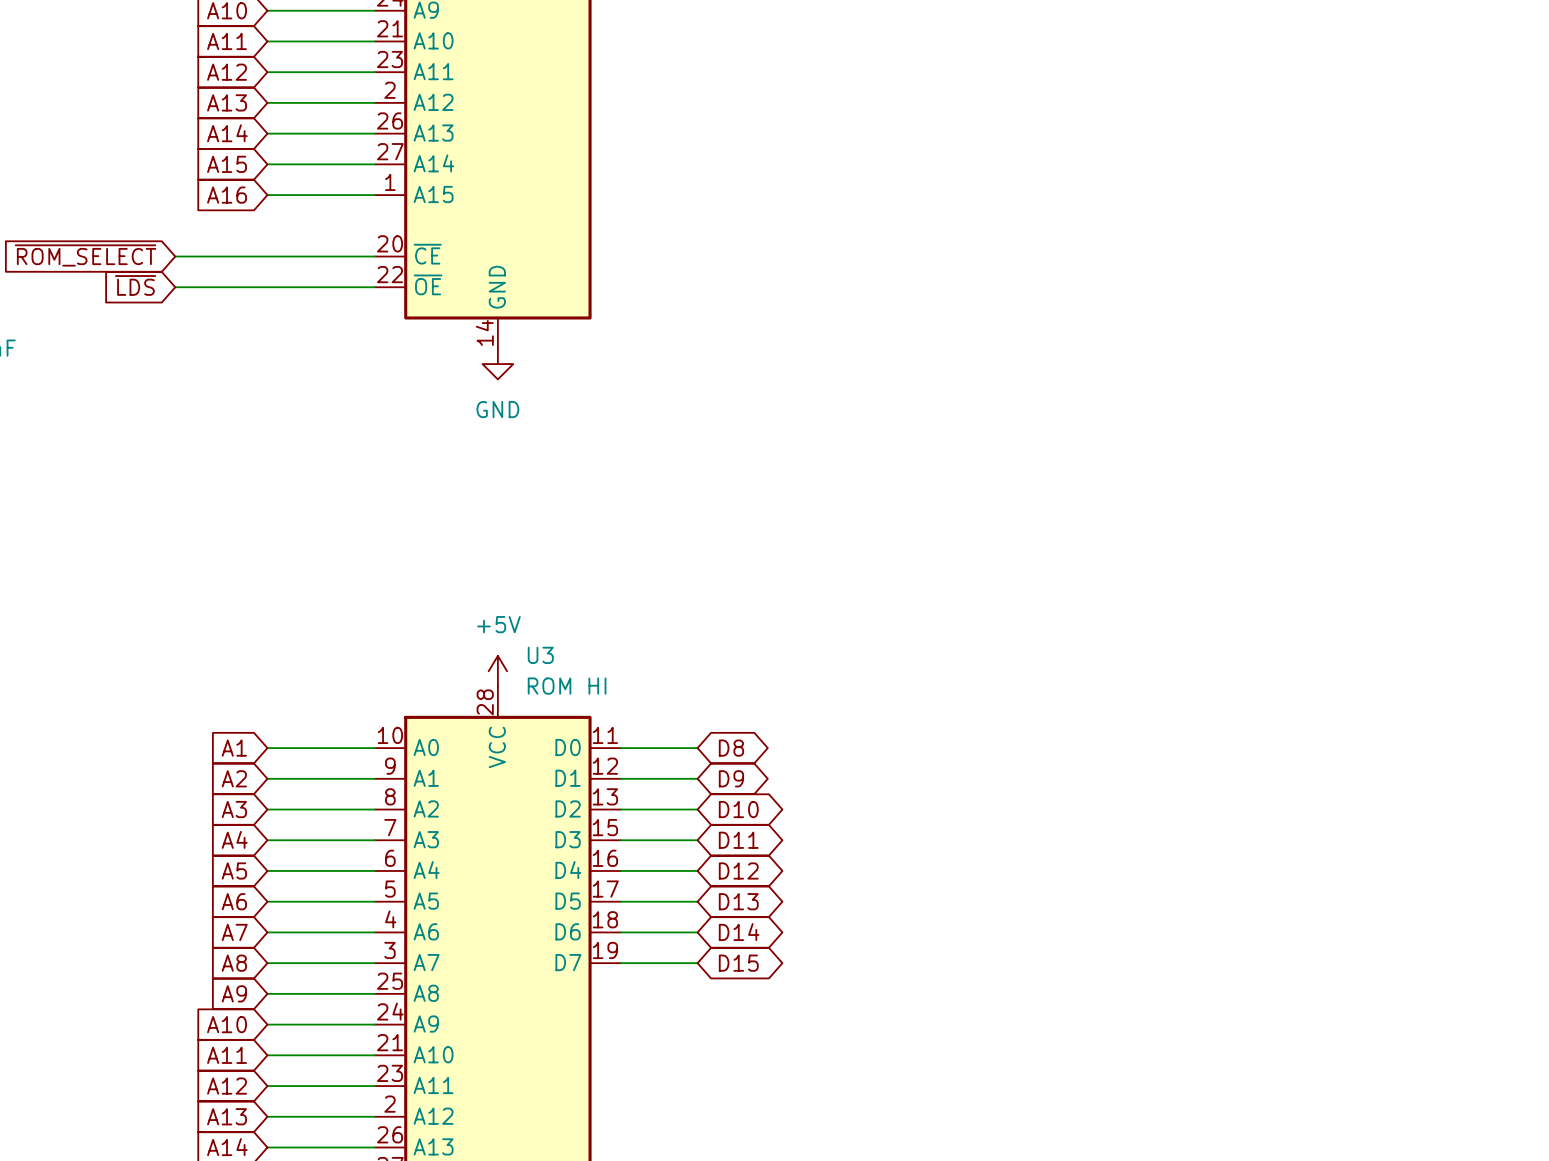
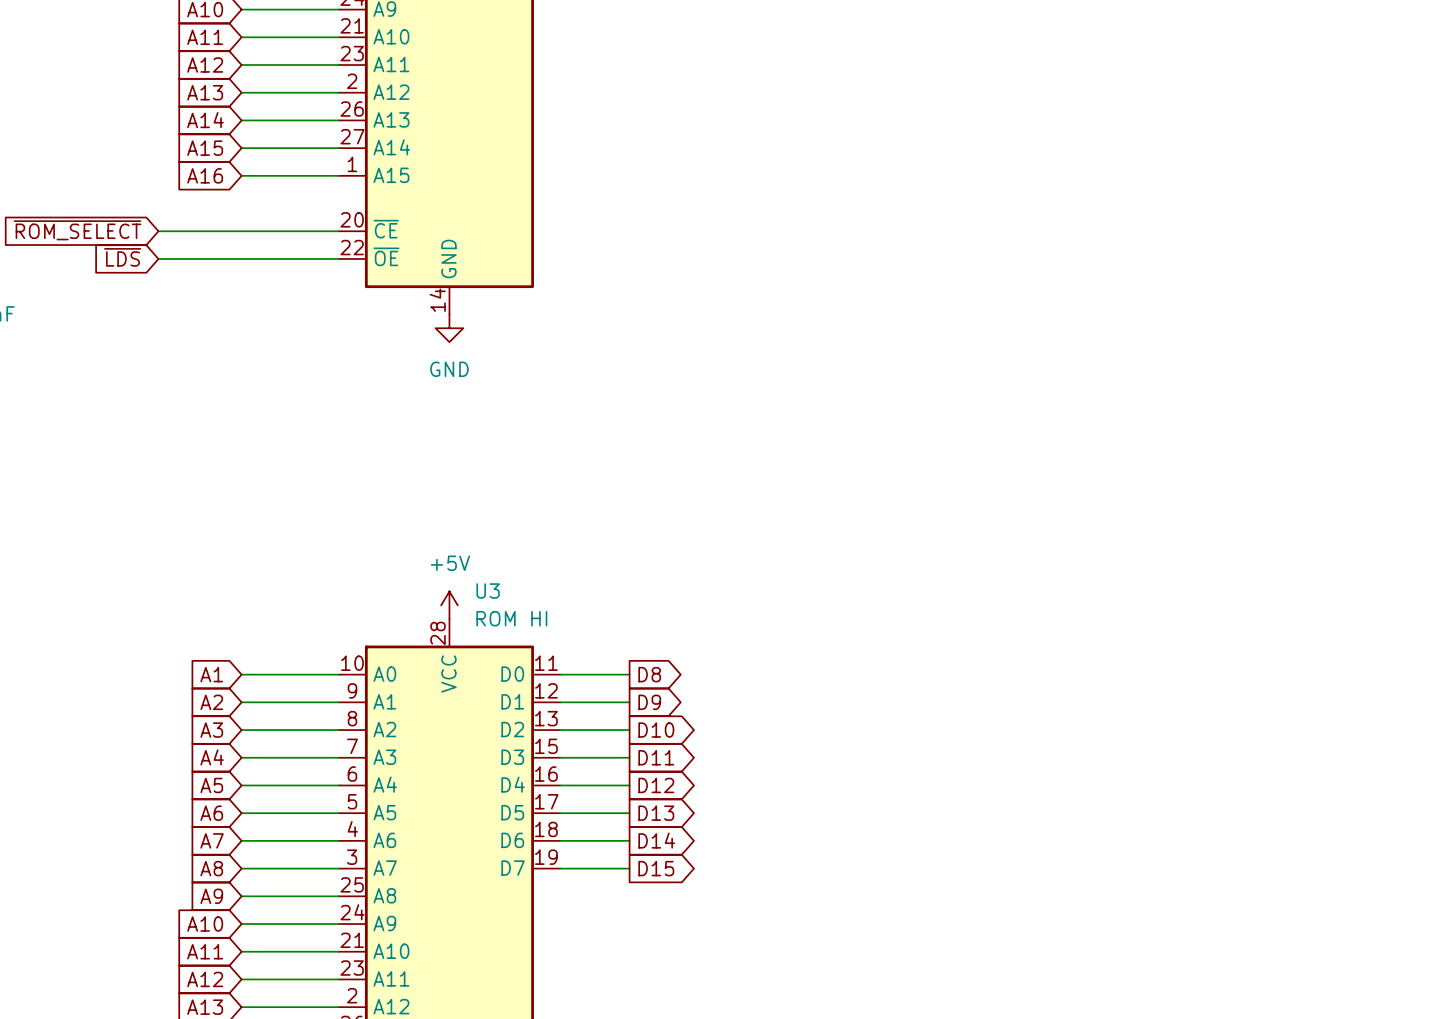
global label shape: bidirectional (731, 748) -> output (649, 674)
global label shape: bidirectional (731, 778) -> output (649, 702)
global label shape: bidirectional (738, 809) -> output (656, 730)
global label shape: bidirectional (738, 840) -> output (656, 757)
global label shape: bidirectional (738, 870) -> output (656, 785)
global label shape: bidirectional (738, 901) -> output (656, 813)
global label shape: bidirectional (739, 932) -> output (656, 840)
global label shape: bidirectional (738, 963) -> output (656, 868)

